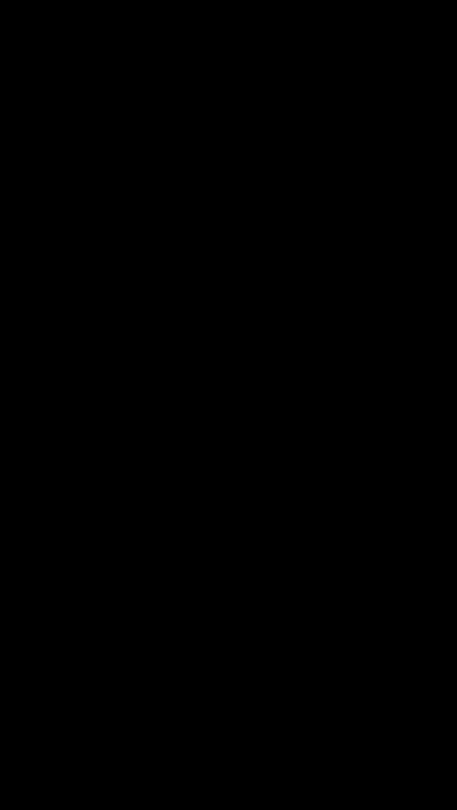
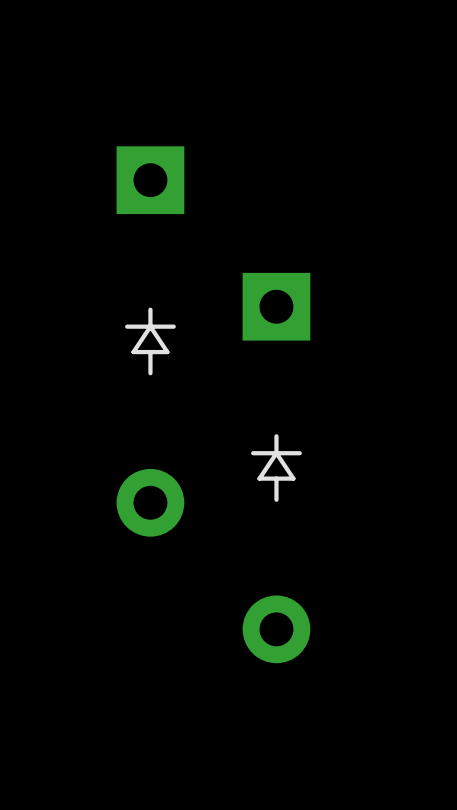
part: none -> (150, 341)
part: none -> (276, 468)

